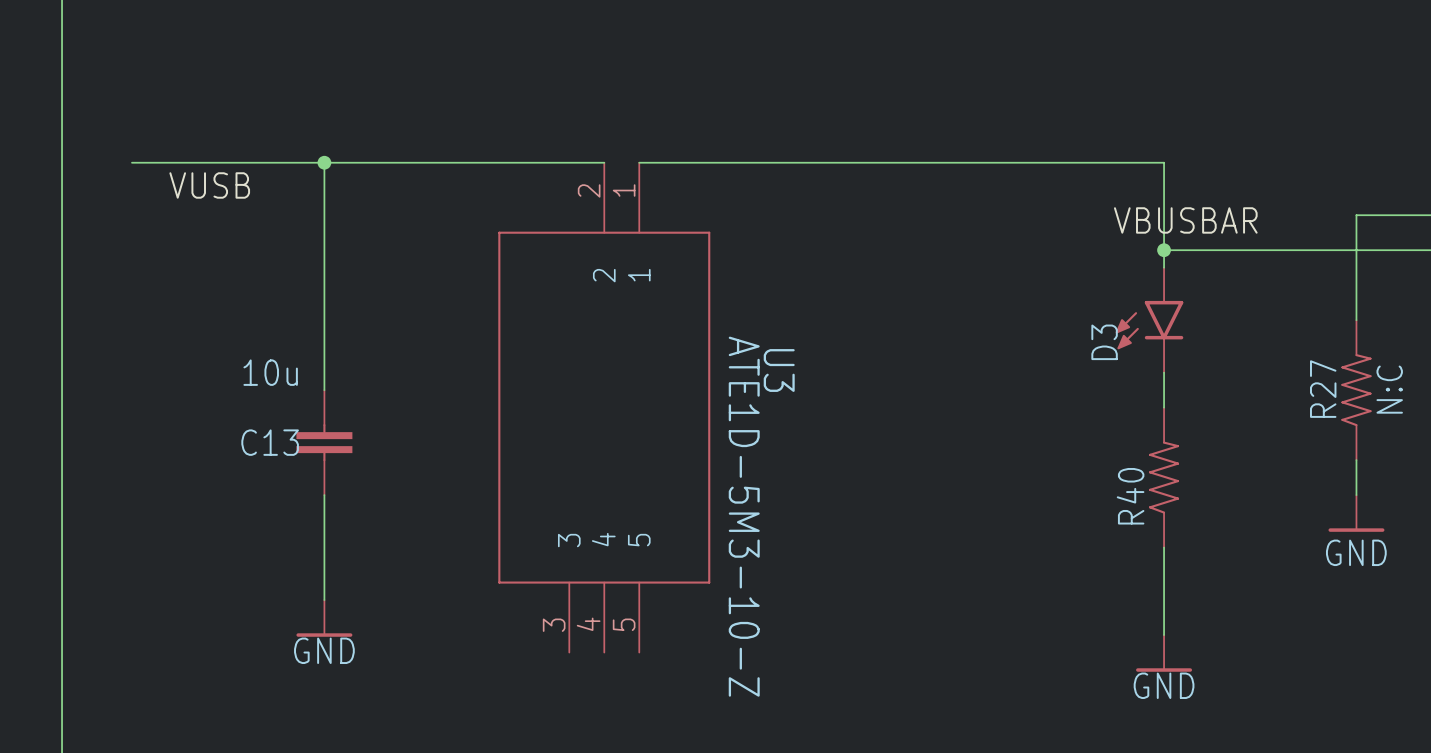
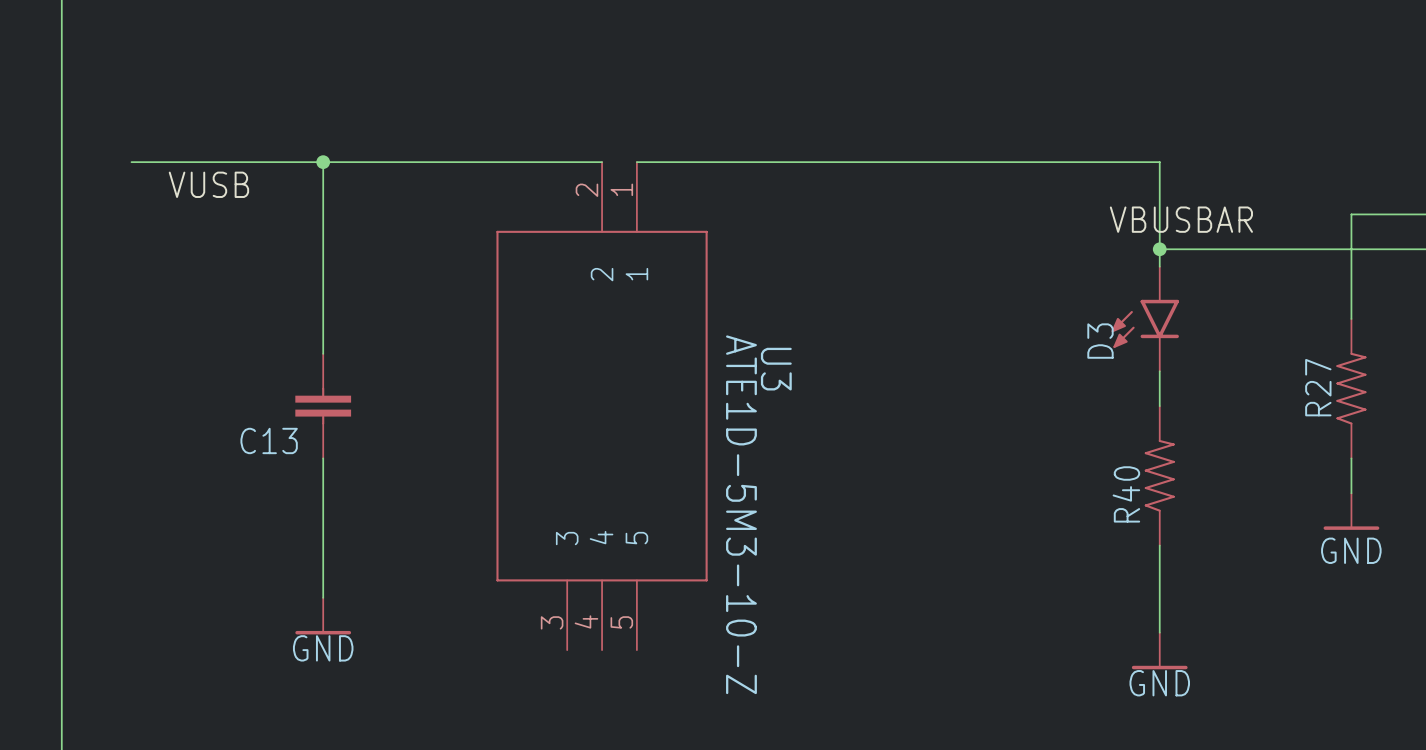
C13 value: 10u (270, 372) -> none
R27 value: N:C (1389, 389) -> none
C13 position: (324, 442) -> (323, 406)

